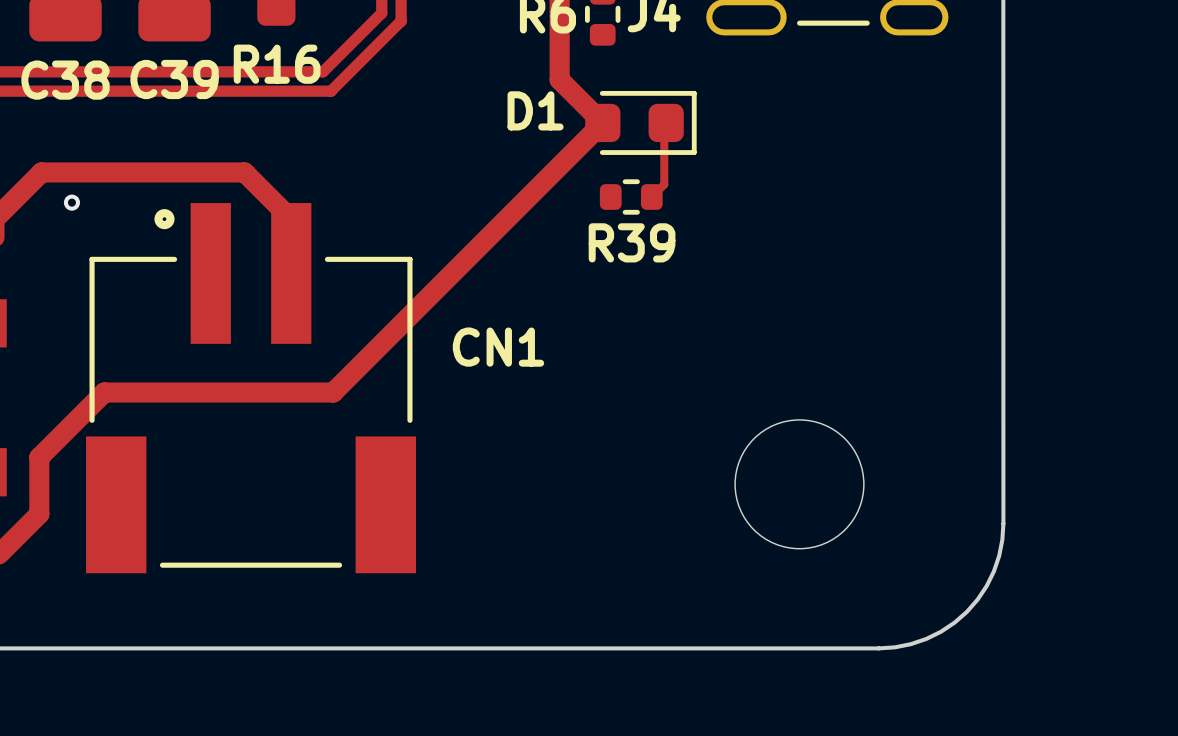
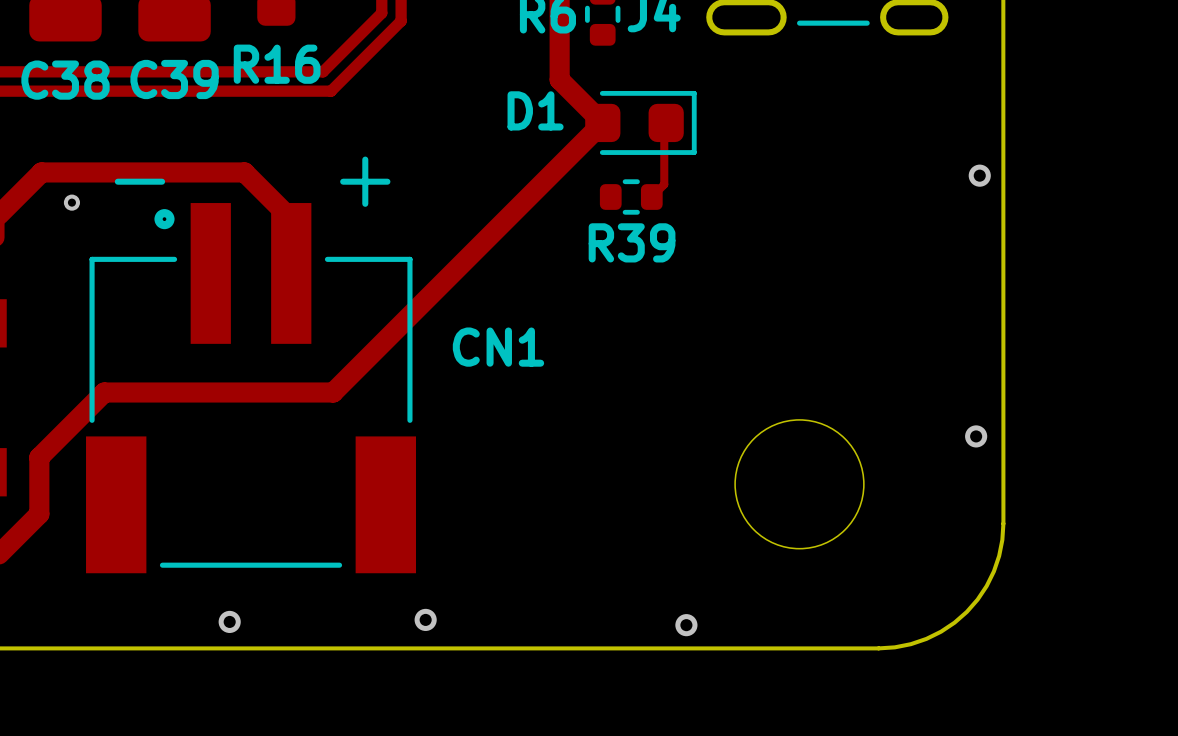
line: none -> (365, 159) (365, 203)
via: none -> (979, 175)
line: none -> (117, 181) (162, 181)
line: none -> (343, 181) (387, 181)
via: none -> (976, 436)
via: none -> (425, 619)
via: none -> (229, 621)
via: none -> (686, 625)

